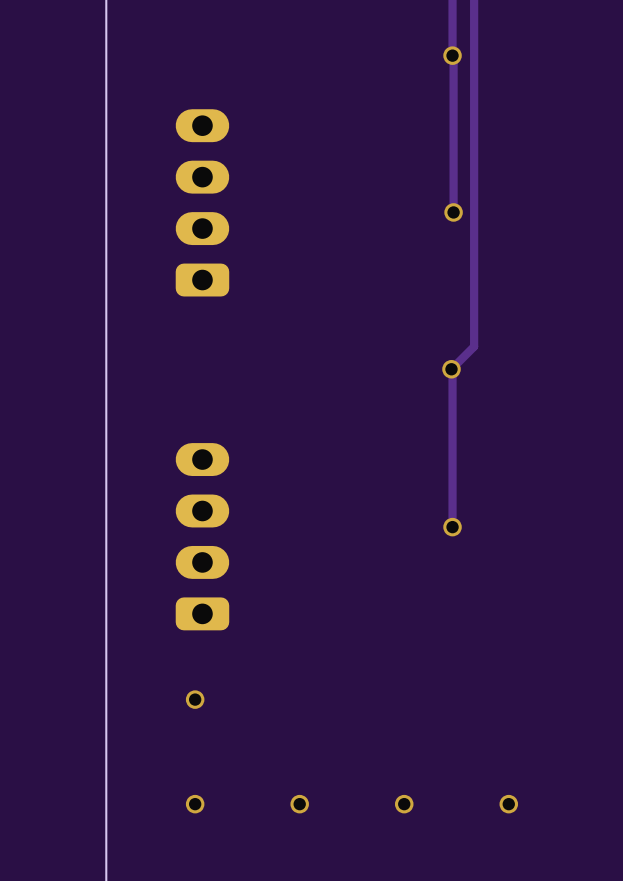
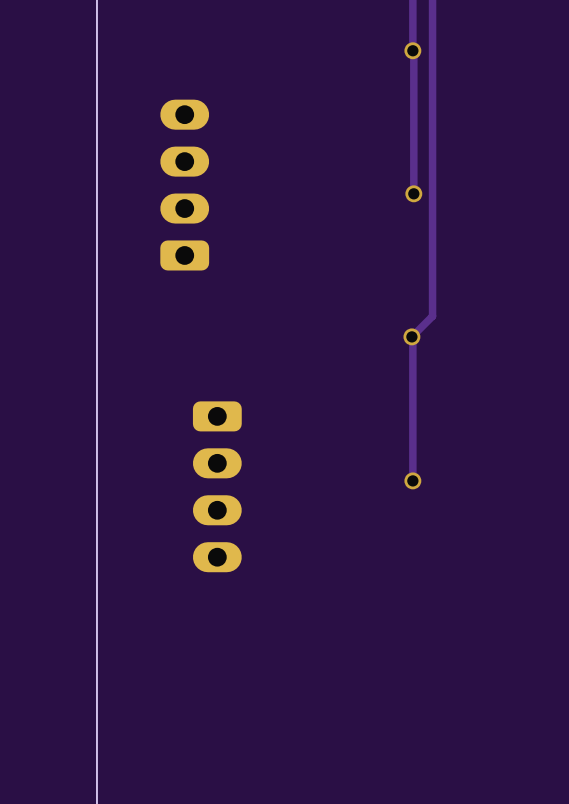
part rotation: 0° (202, 536) -> 180° (217, 486)
via: (195, 699) -> none
via: (195, 804) -> none
via: (299, 804) -> none
via: (404, 804) -> none
via: (508, 804) -> none

